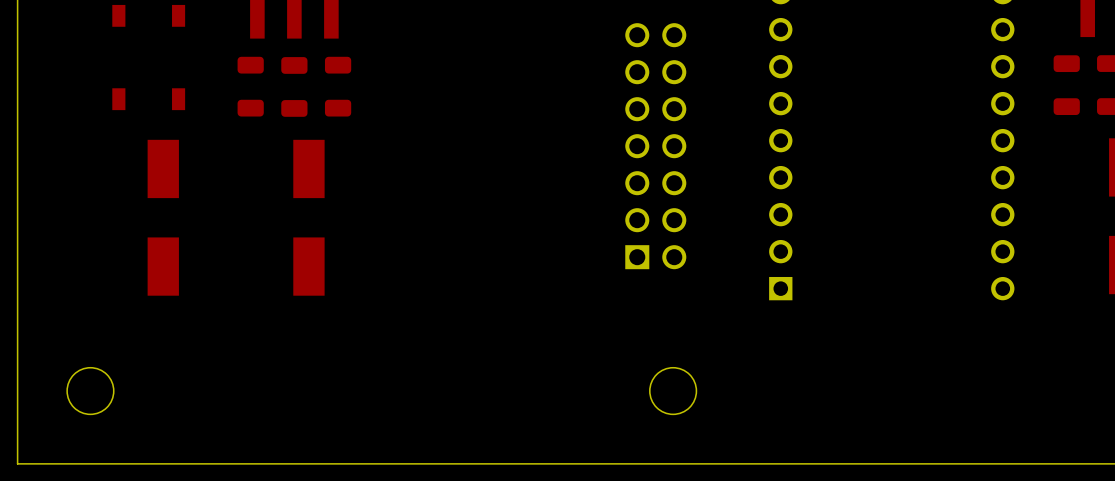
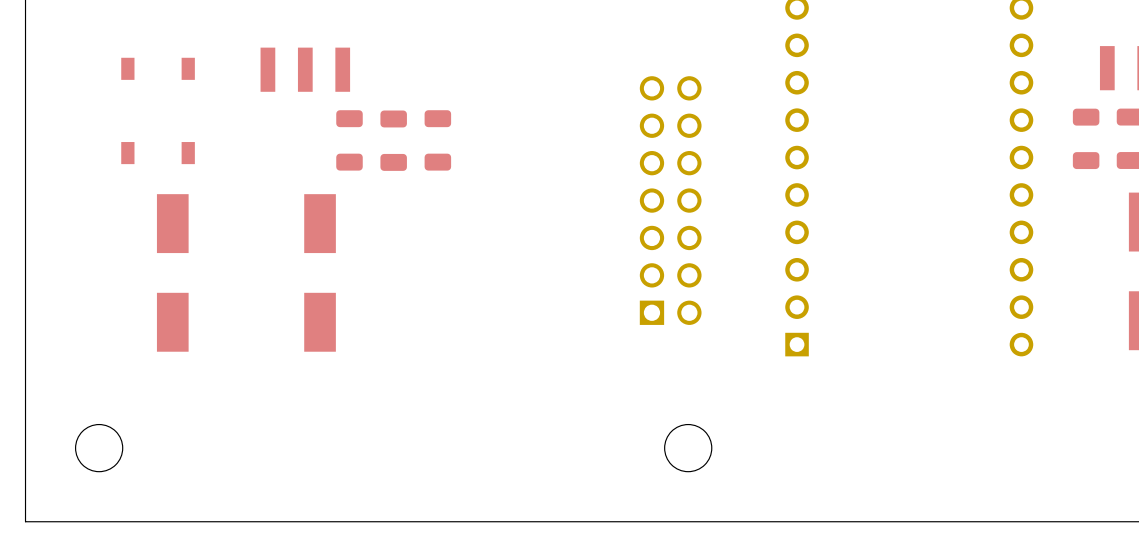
part: (250, 86) -> none
part: (294, 86) -> none
part: none -> (393, 140)
part: none -> (437, 140)

